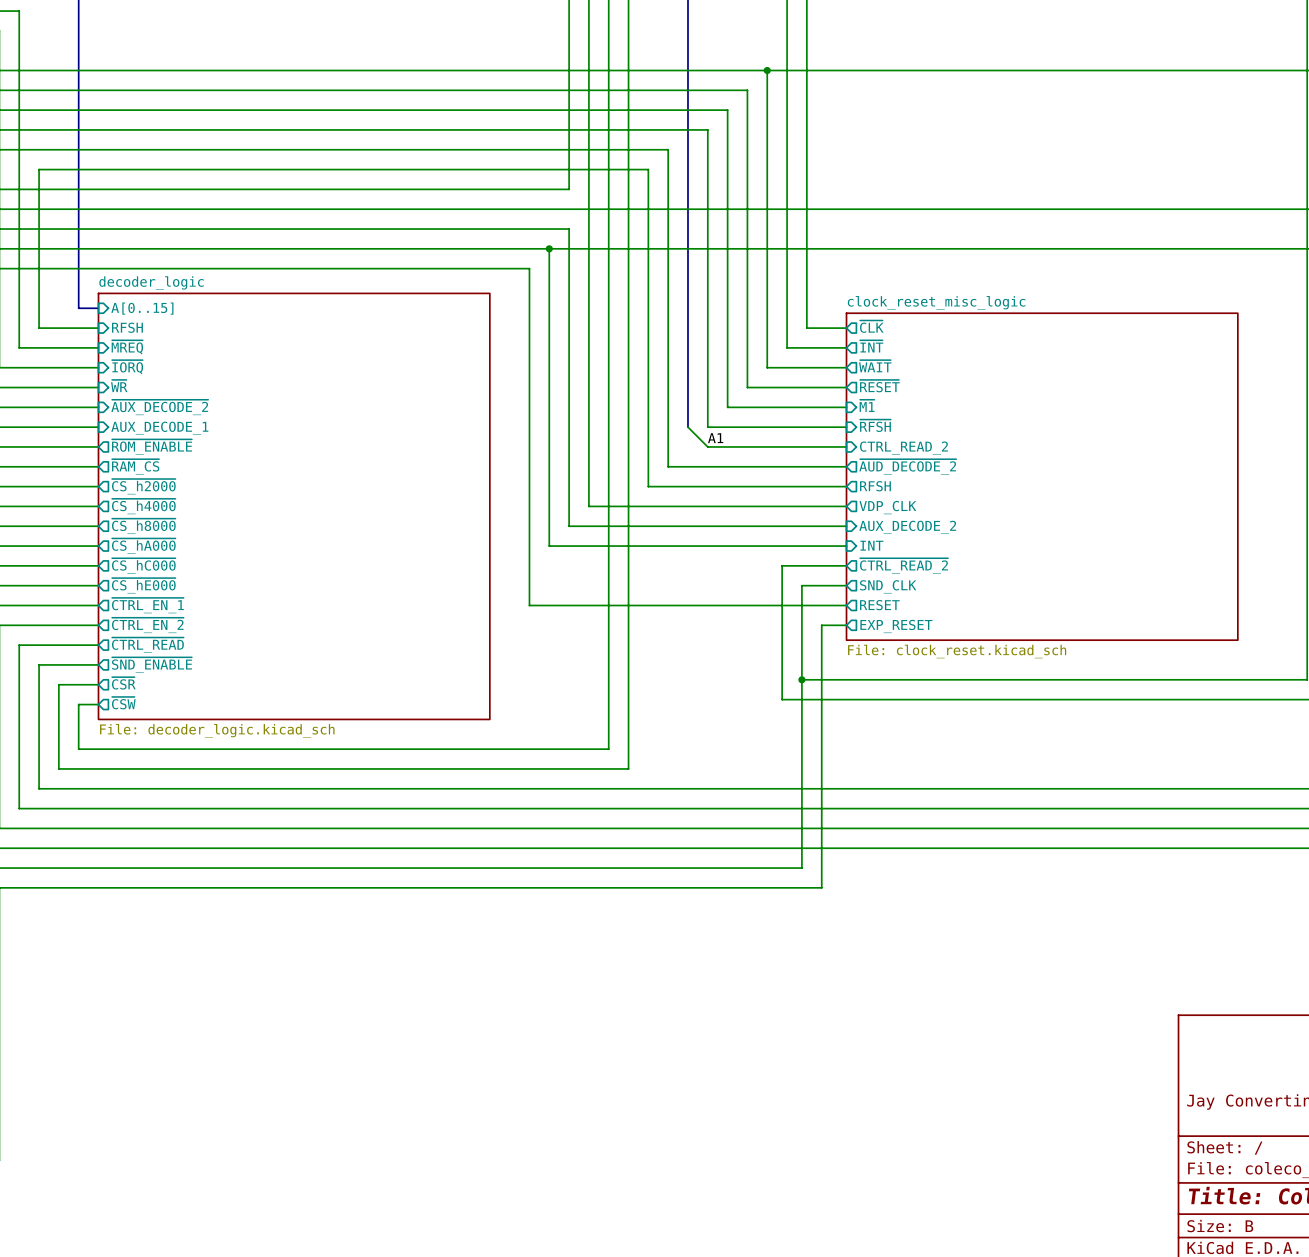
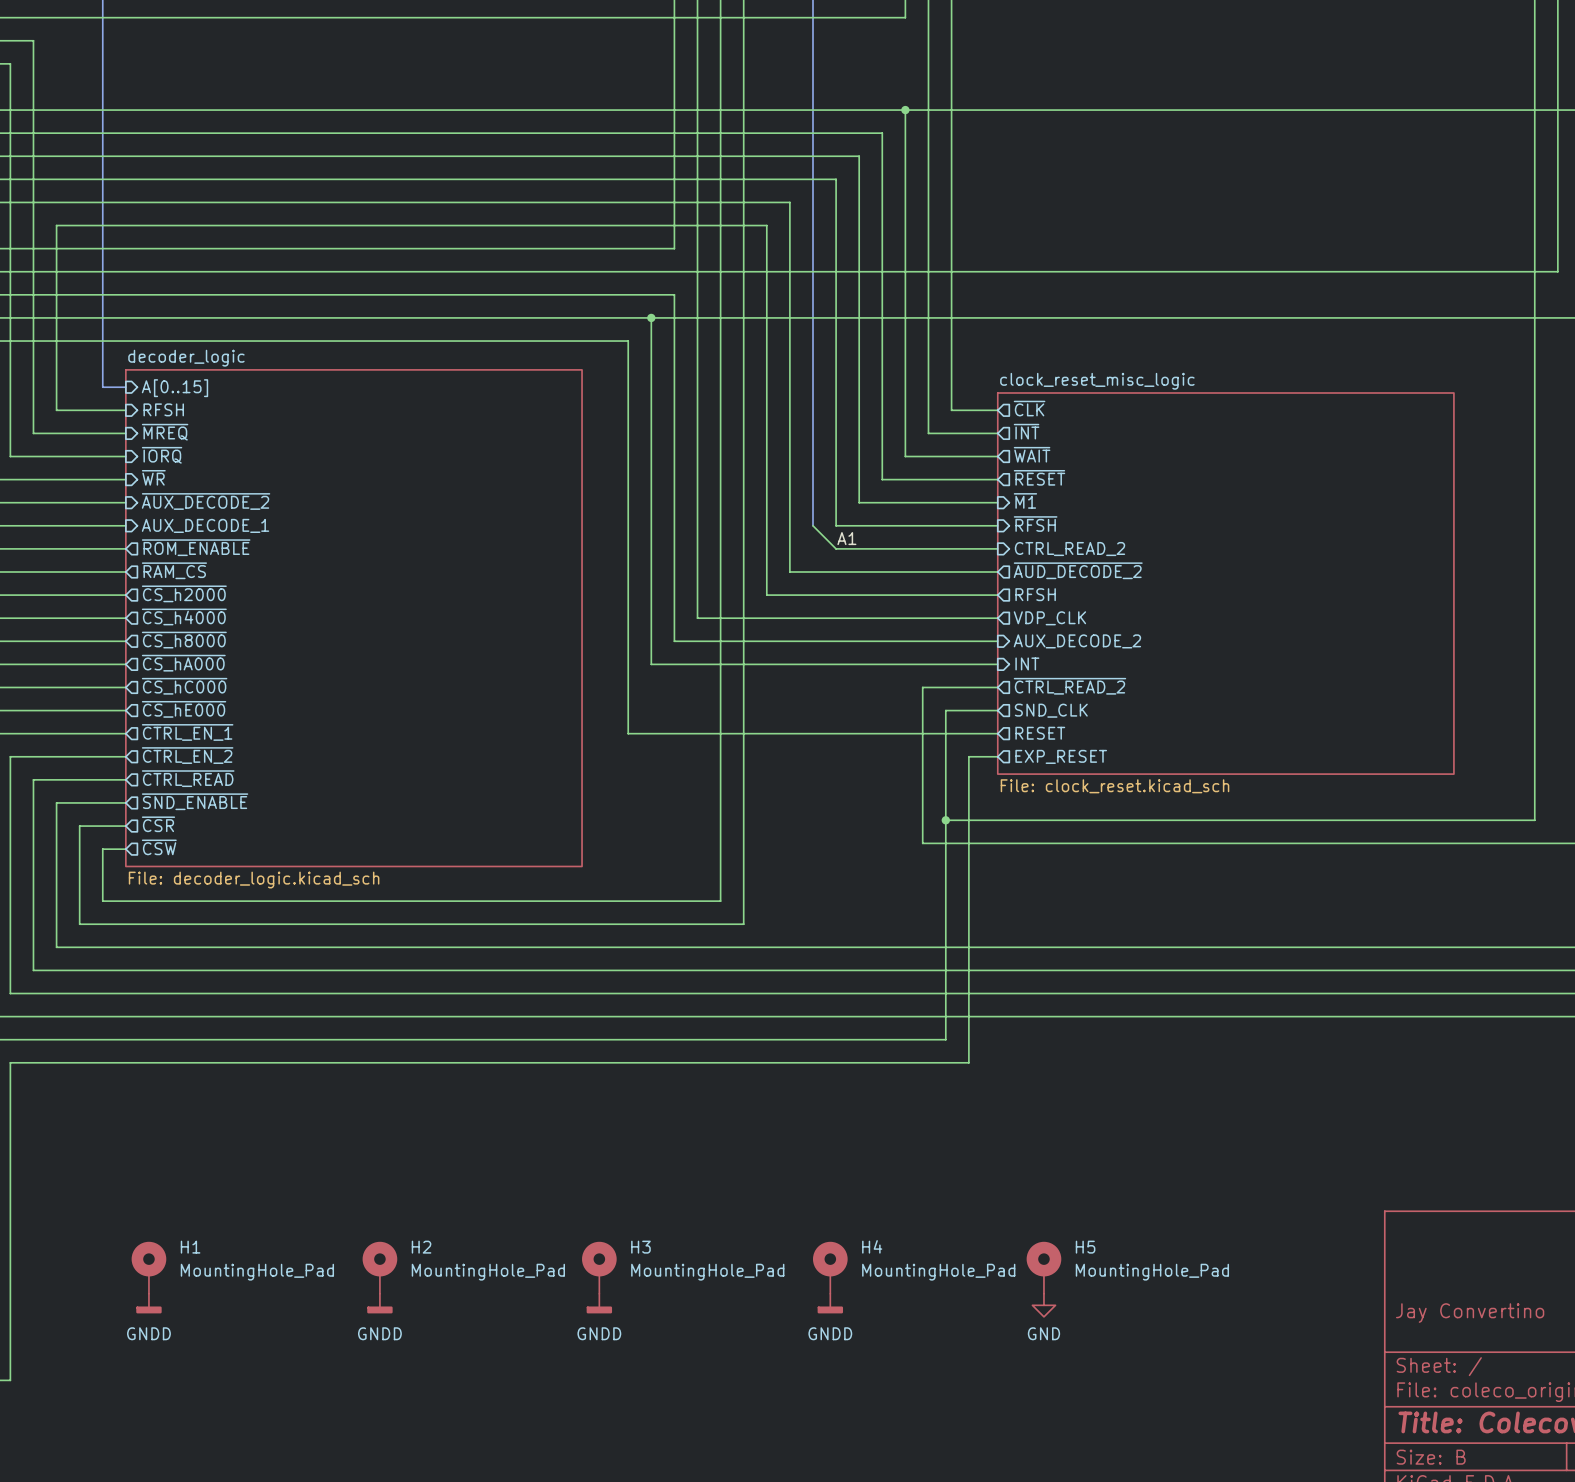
H1: none -> MountingHole_Pad (148, 1267)
H2: none -> MountingHole_Pad (379, 1267)
H3: none -> MountingHole_Pad (599, 1267)
H4: none -> MountingHole_Pad (830, 1267)
H5: none -> MountingHole_Pad (1043, 1267)
power symbol: none -> GNDD (148, 1303)
power symbol: none -> GNDD (379, 1303)
power symbol: none -> GNDD (599, 1303)
power symbol: none -> GNDD (830, 1303)
power symbol: none -> GND (1043, 1305)

